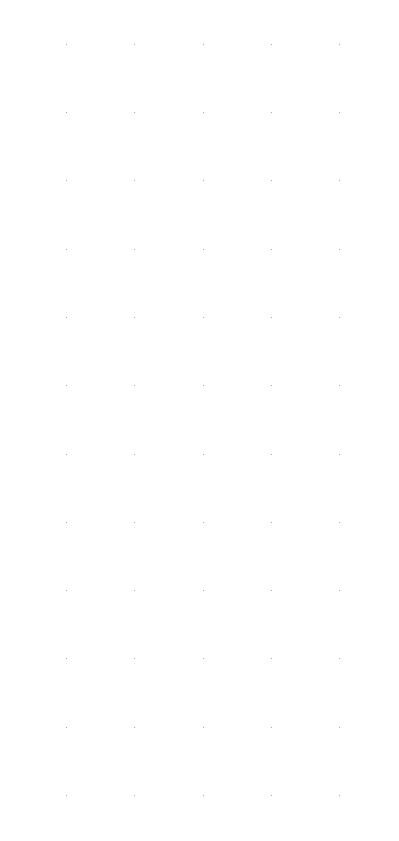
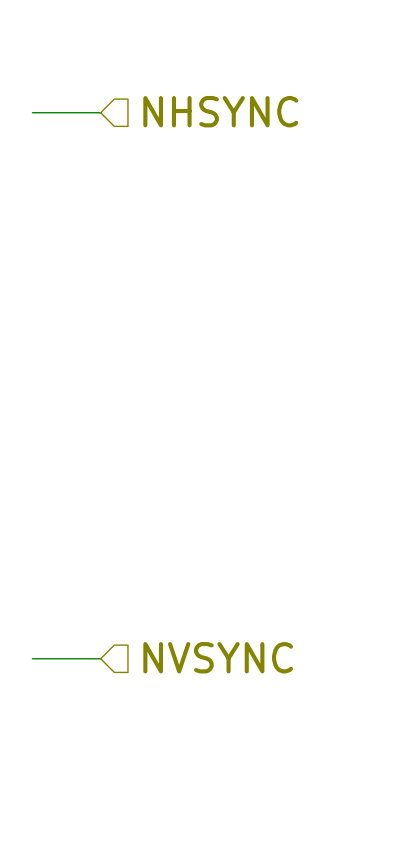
hierarchical label: none -> NHSYNC (220, 111)
wire: none -> (32, 112) (100, 112)
hierarchical label: none -> NVSYNC (218, 657)
wire: none -> (32, 658) (100, 658)

